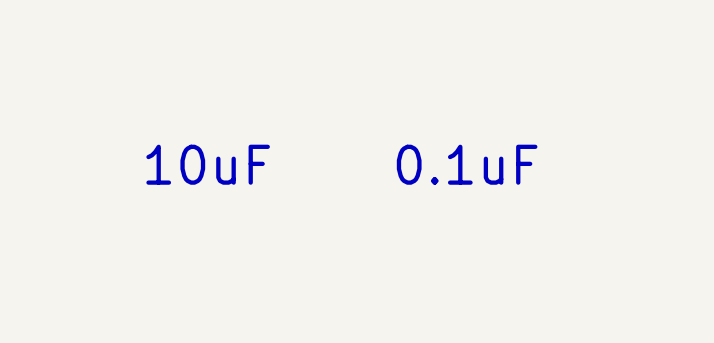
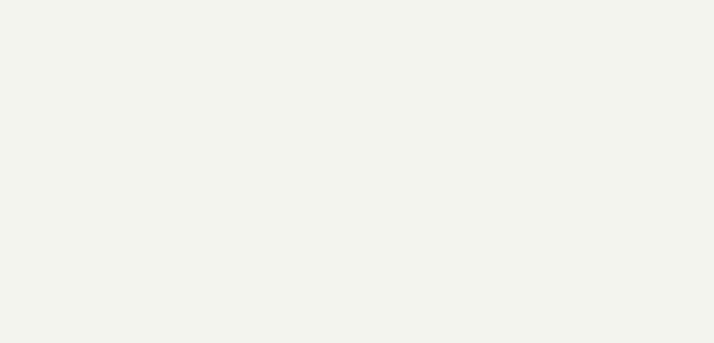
text: 10uF (208, 164) -> none
text: 0.1uF (467, 164) -> none

